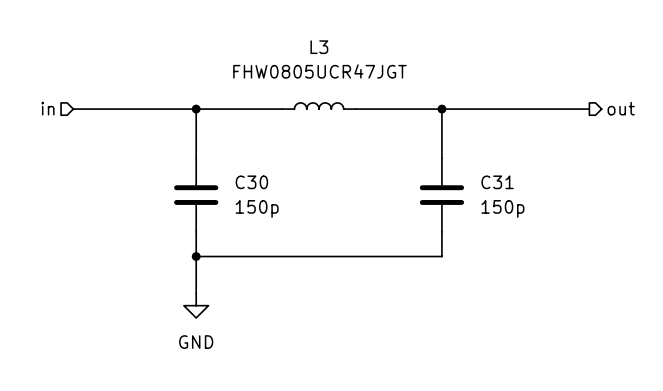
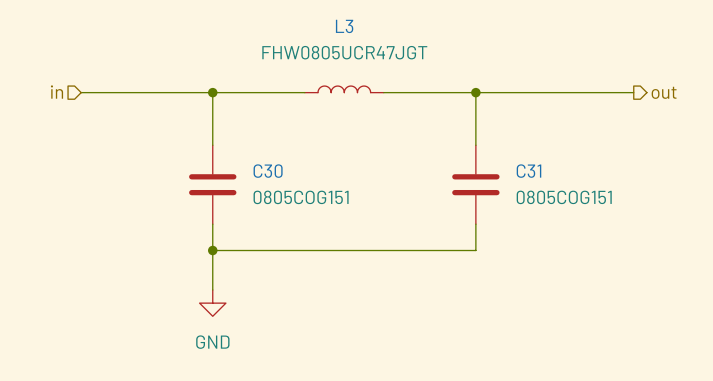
C30 value: 150p (257, 208) -> 0805COG151 (301, 197)
C31 value: 150p (502, 208) -> 0805COG151 (564, 197)

